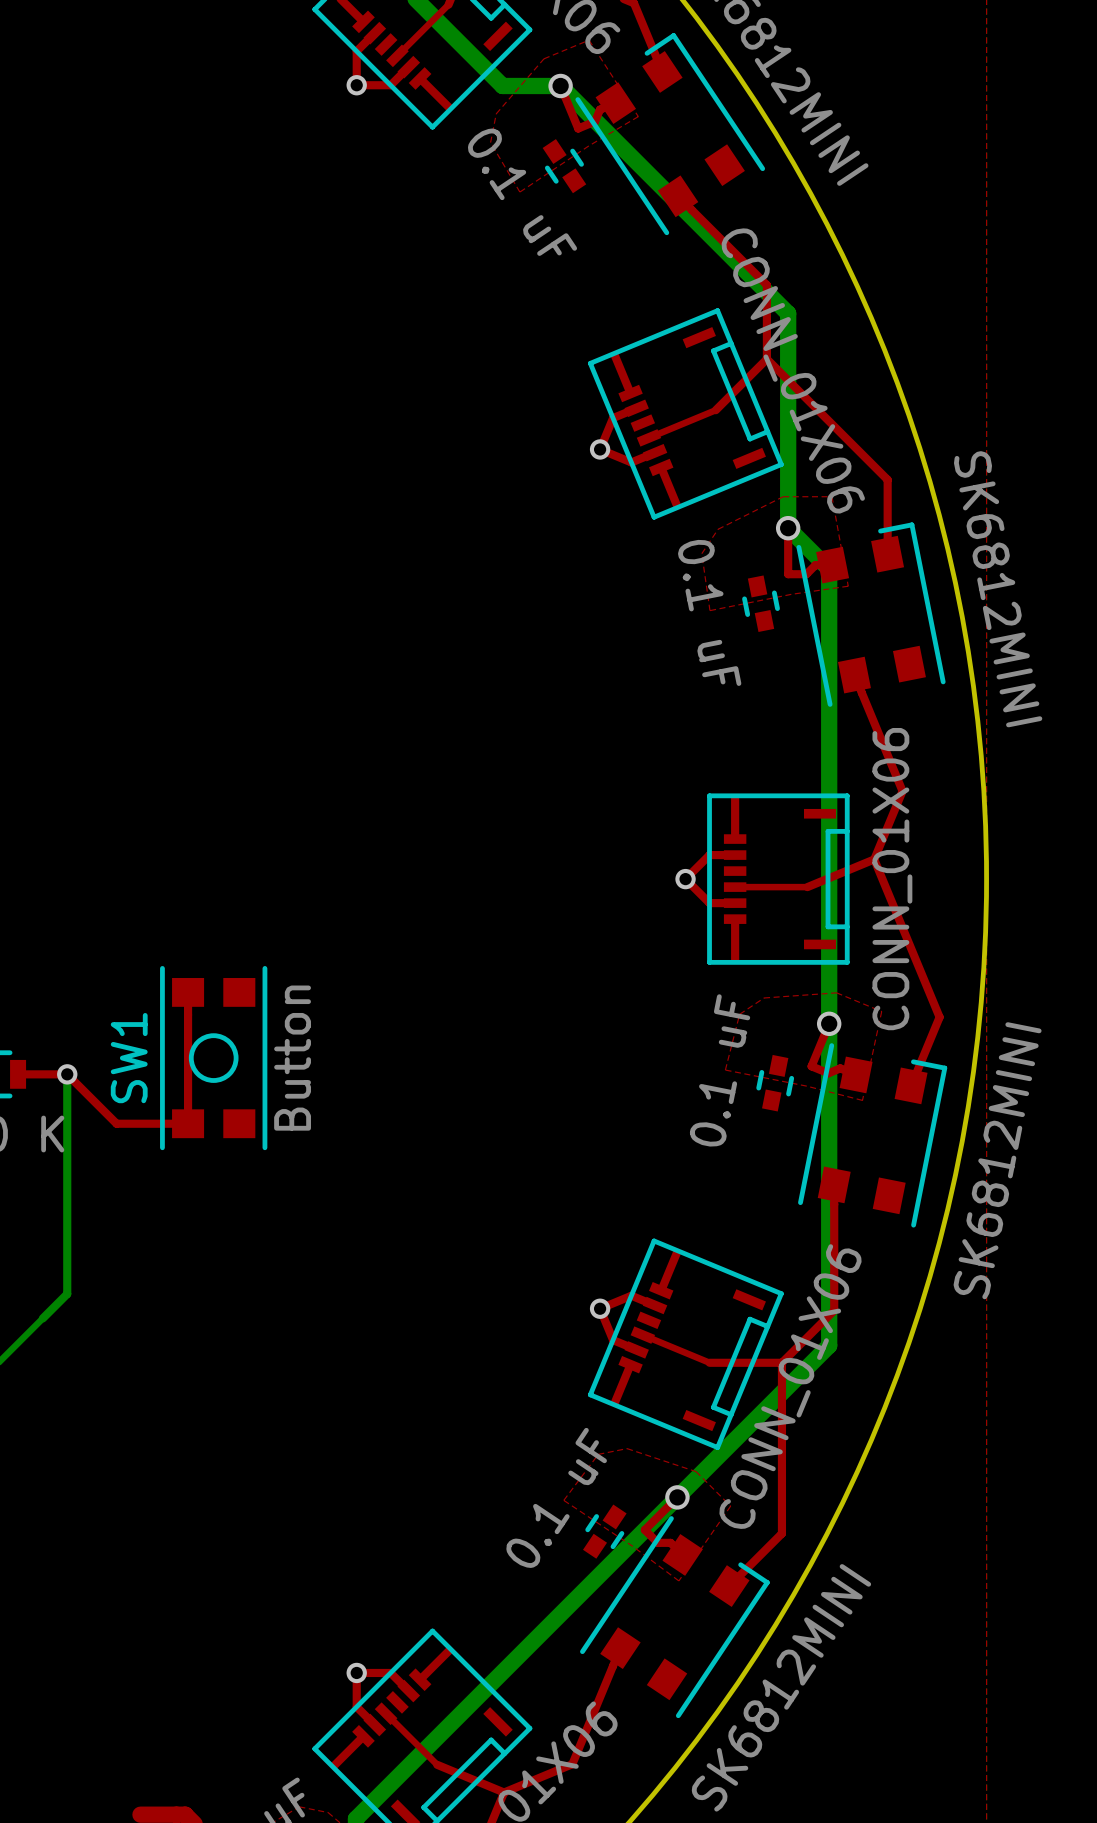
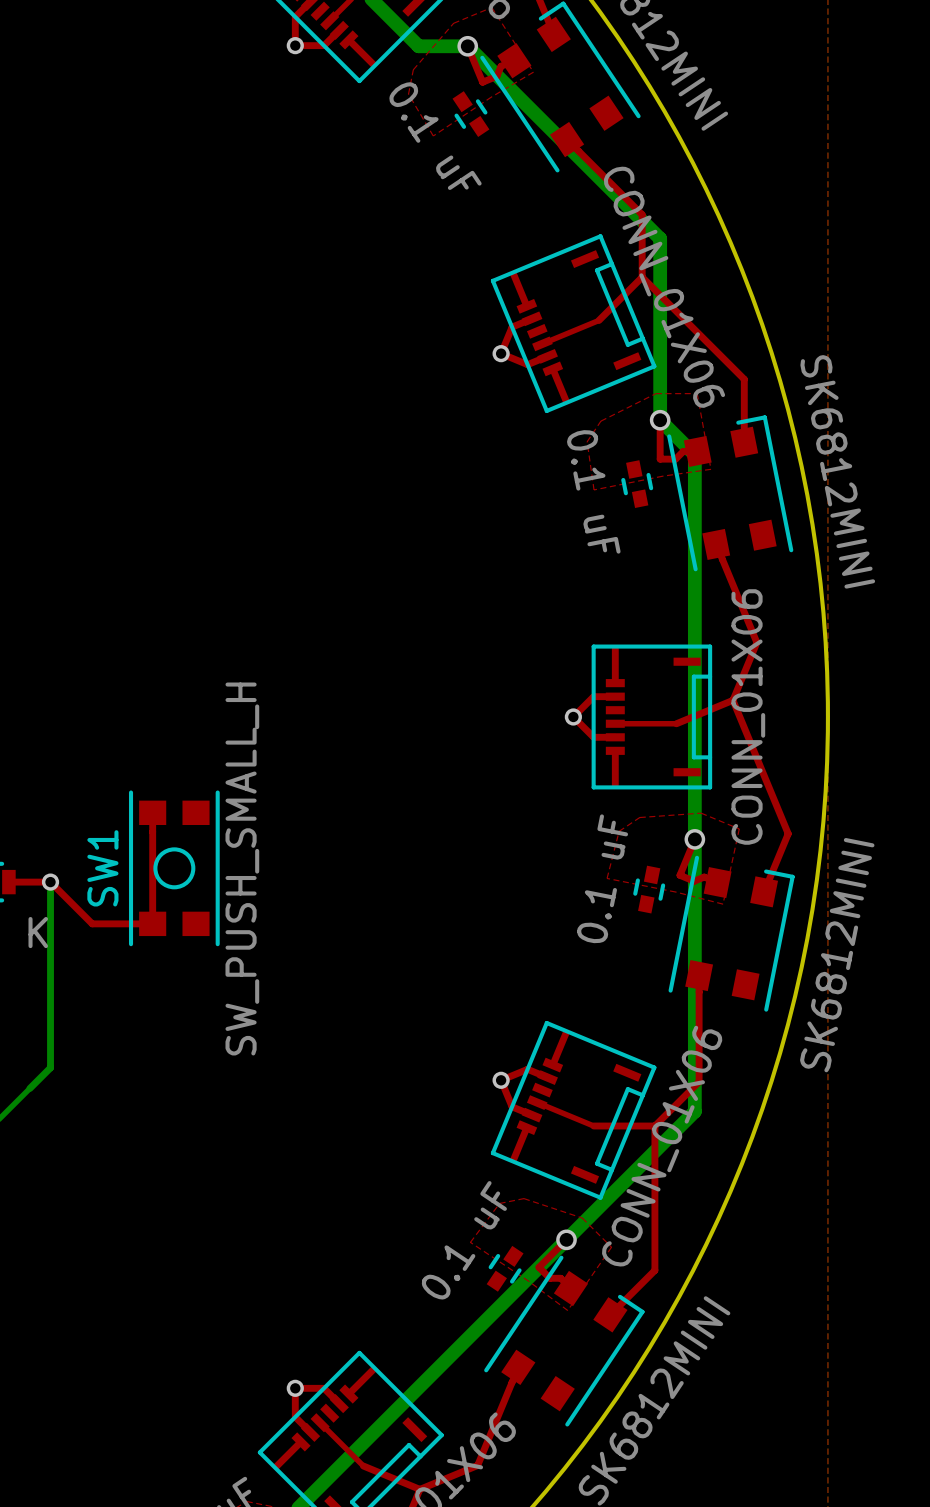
SW1 value: Button (292, 1058) -> SW_PUSH_SMALL_H (242, 868)

